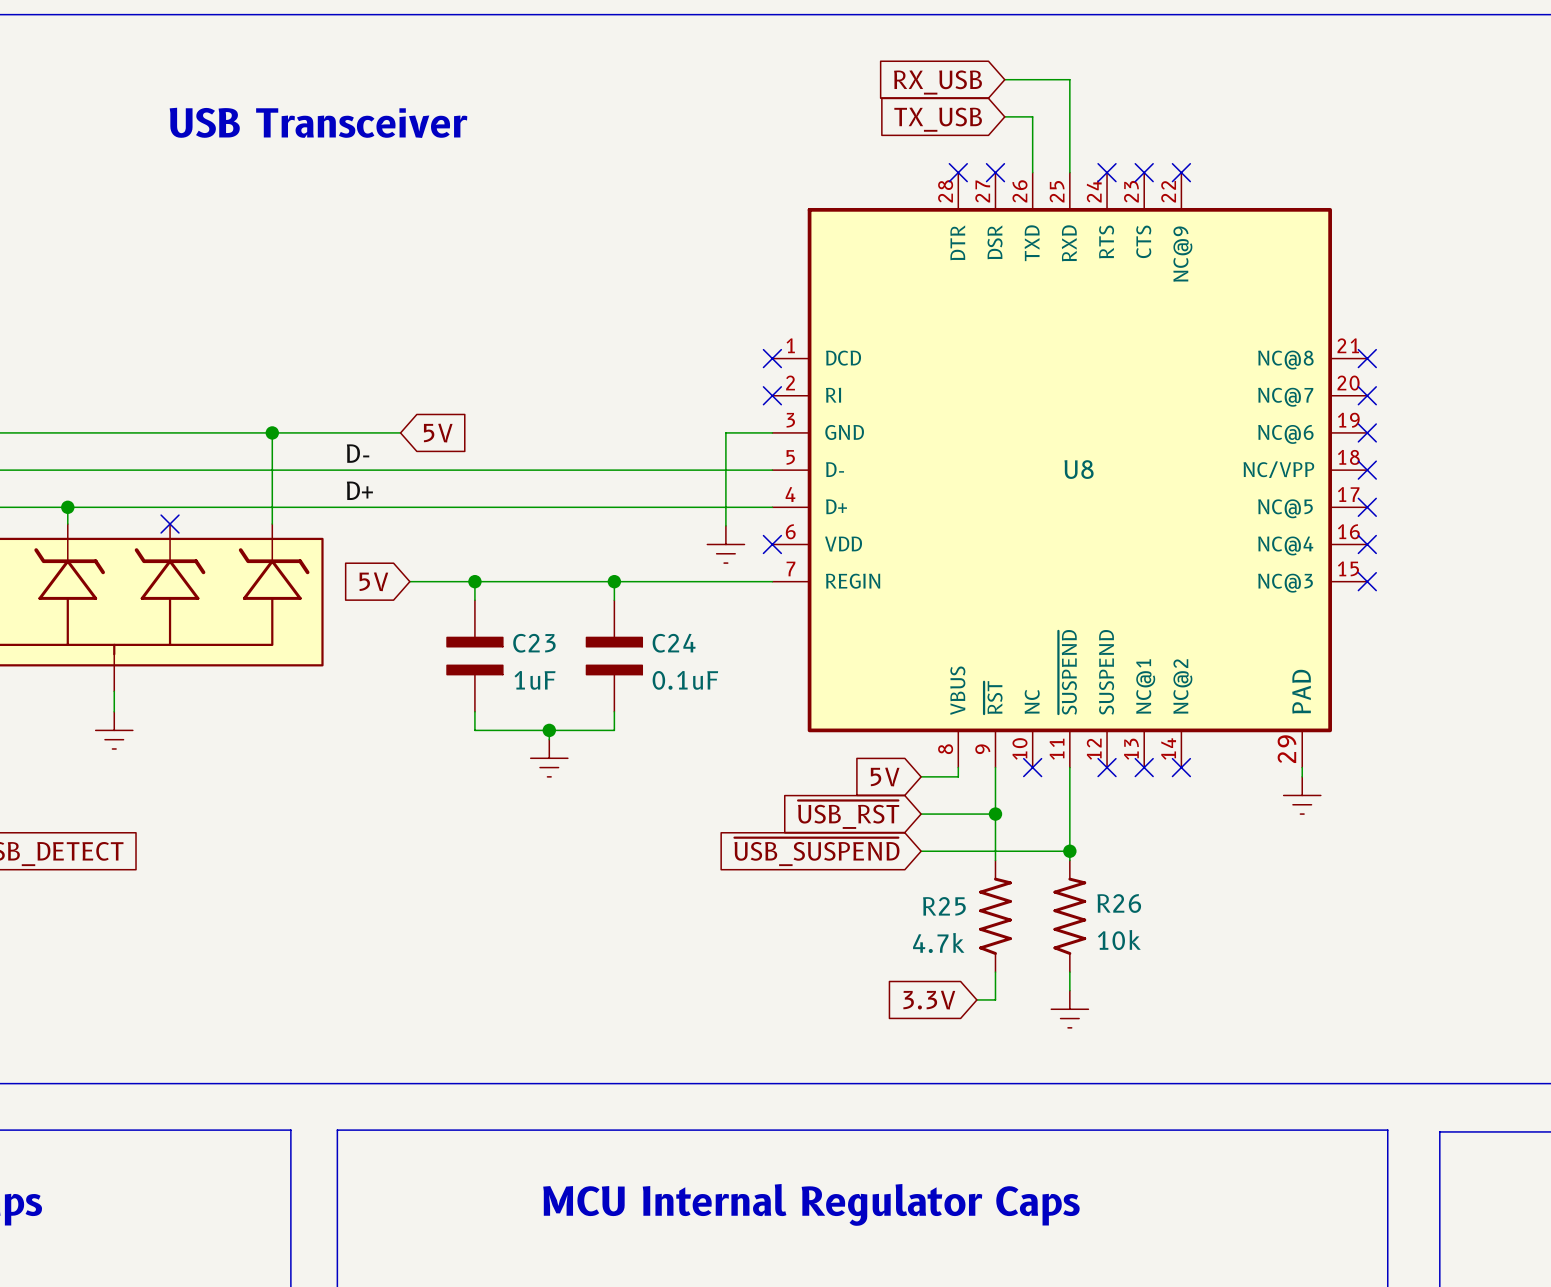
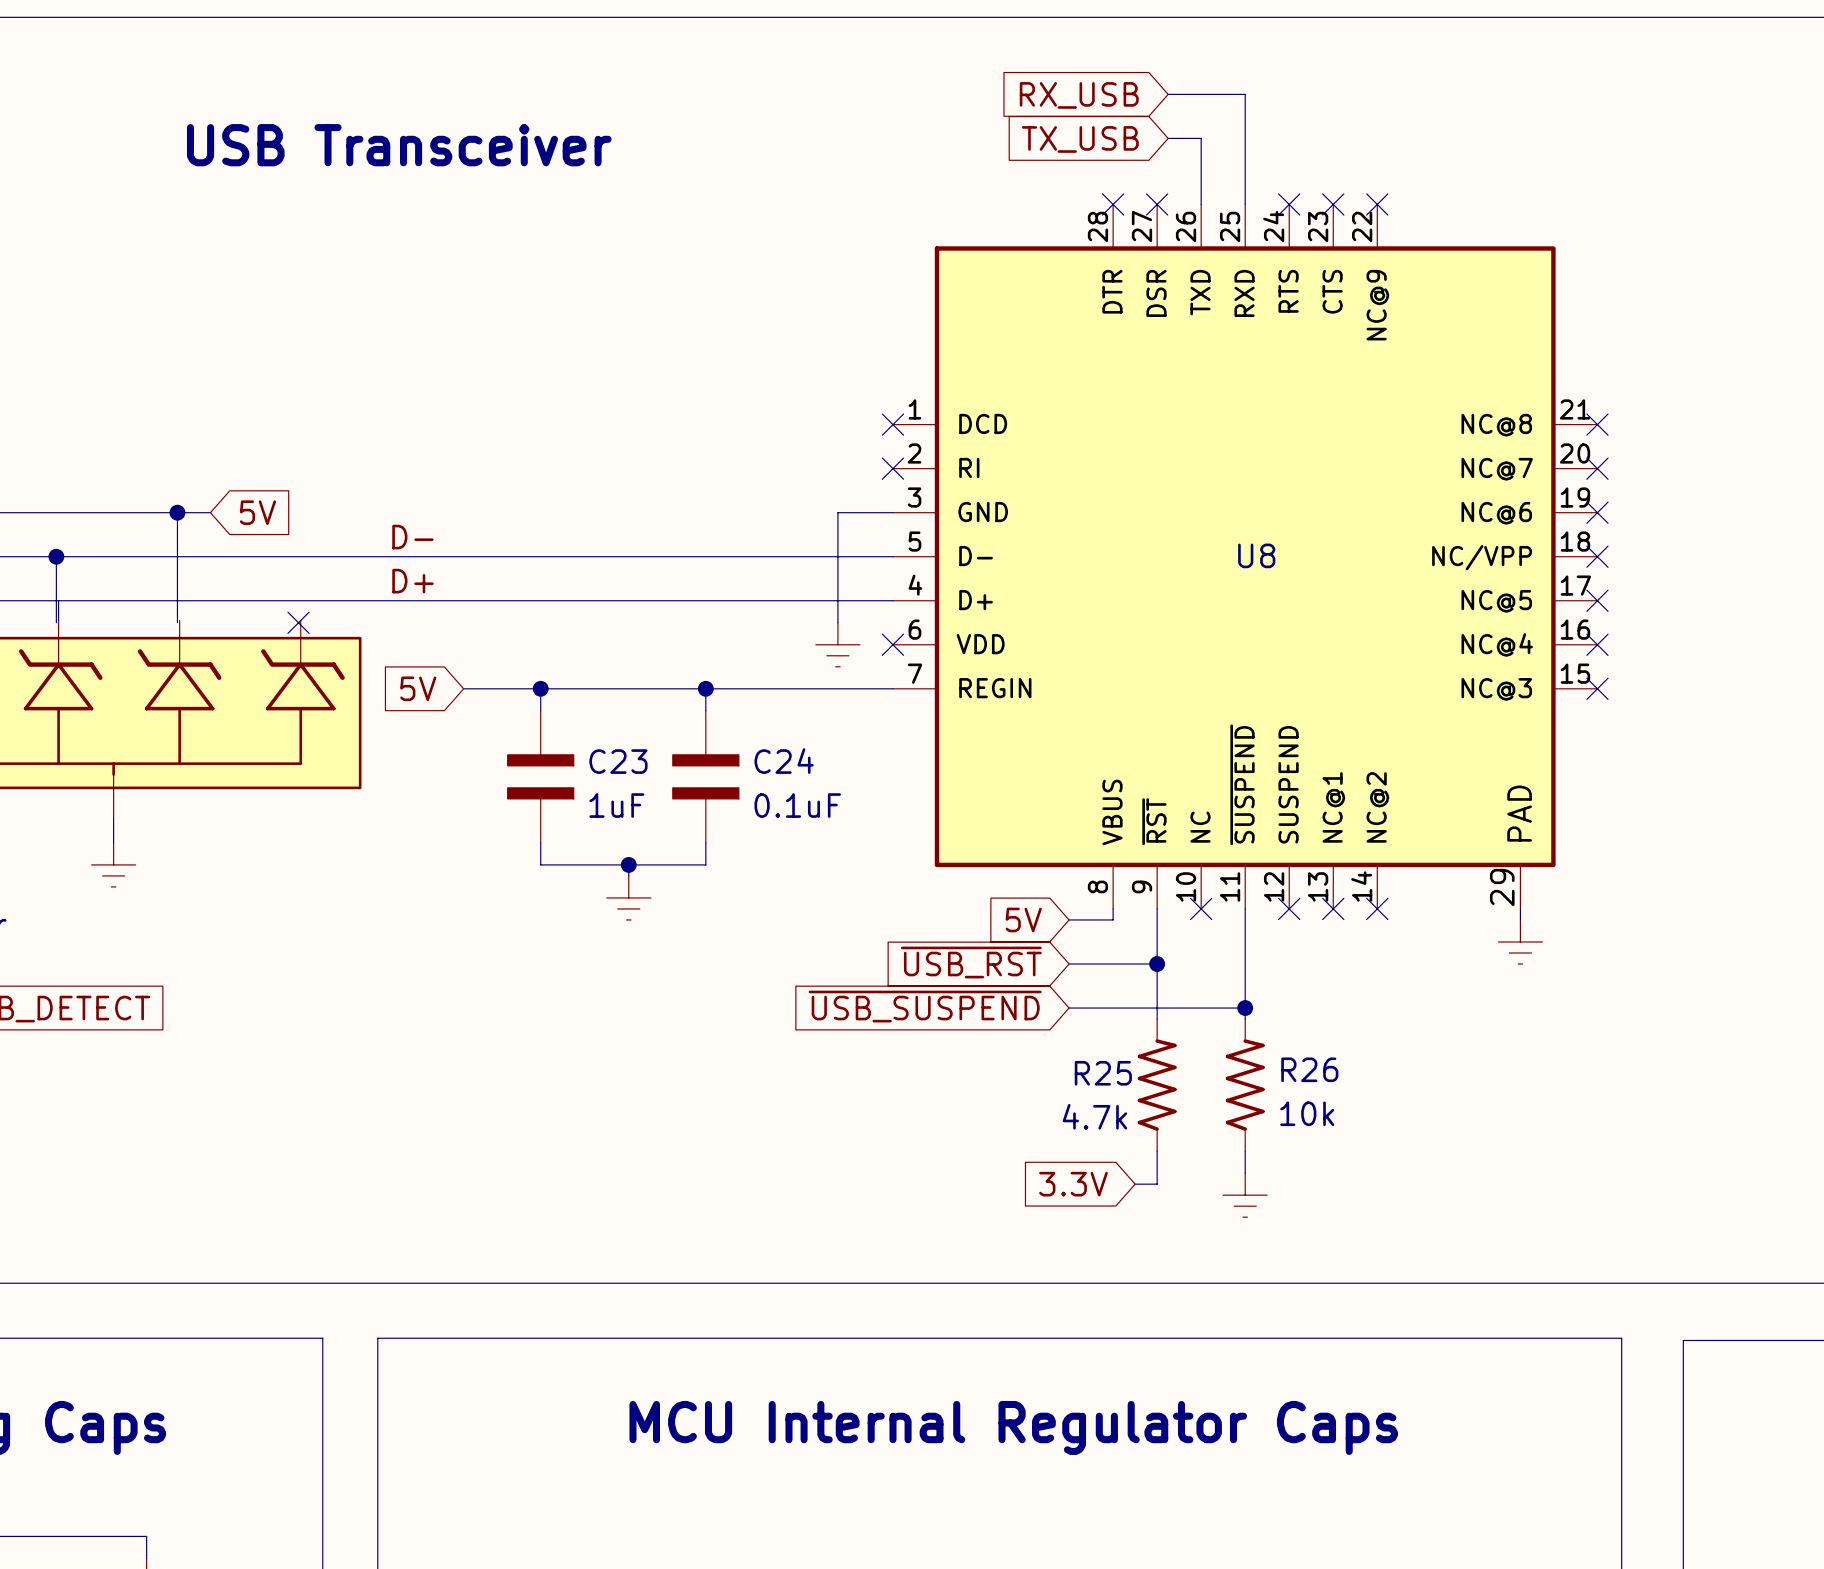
wire: none -> (177, 512) (177, 622)
junction: none -> (177, 512)
wire: (196, 432) (400, 432) -> none
wire: (272, 432) (272, 524) -> none
junction: (272, 432) -> none
global label position: 5V (438, 433) -> 5V (257, 512)
wire: none -> (56, 556) (56, 622)
junction position: (67, 507) -> (56, 556)
no-connect mark: (170, 524) -> none
no-connect mark: none -> (298, 622)

